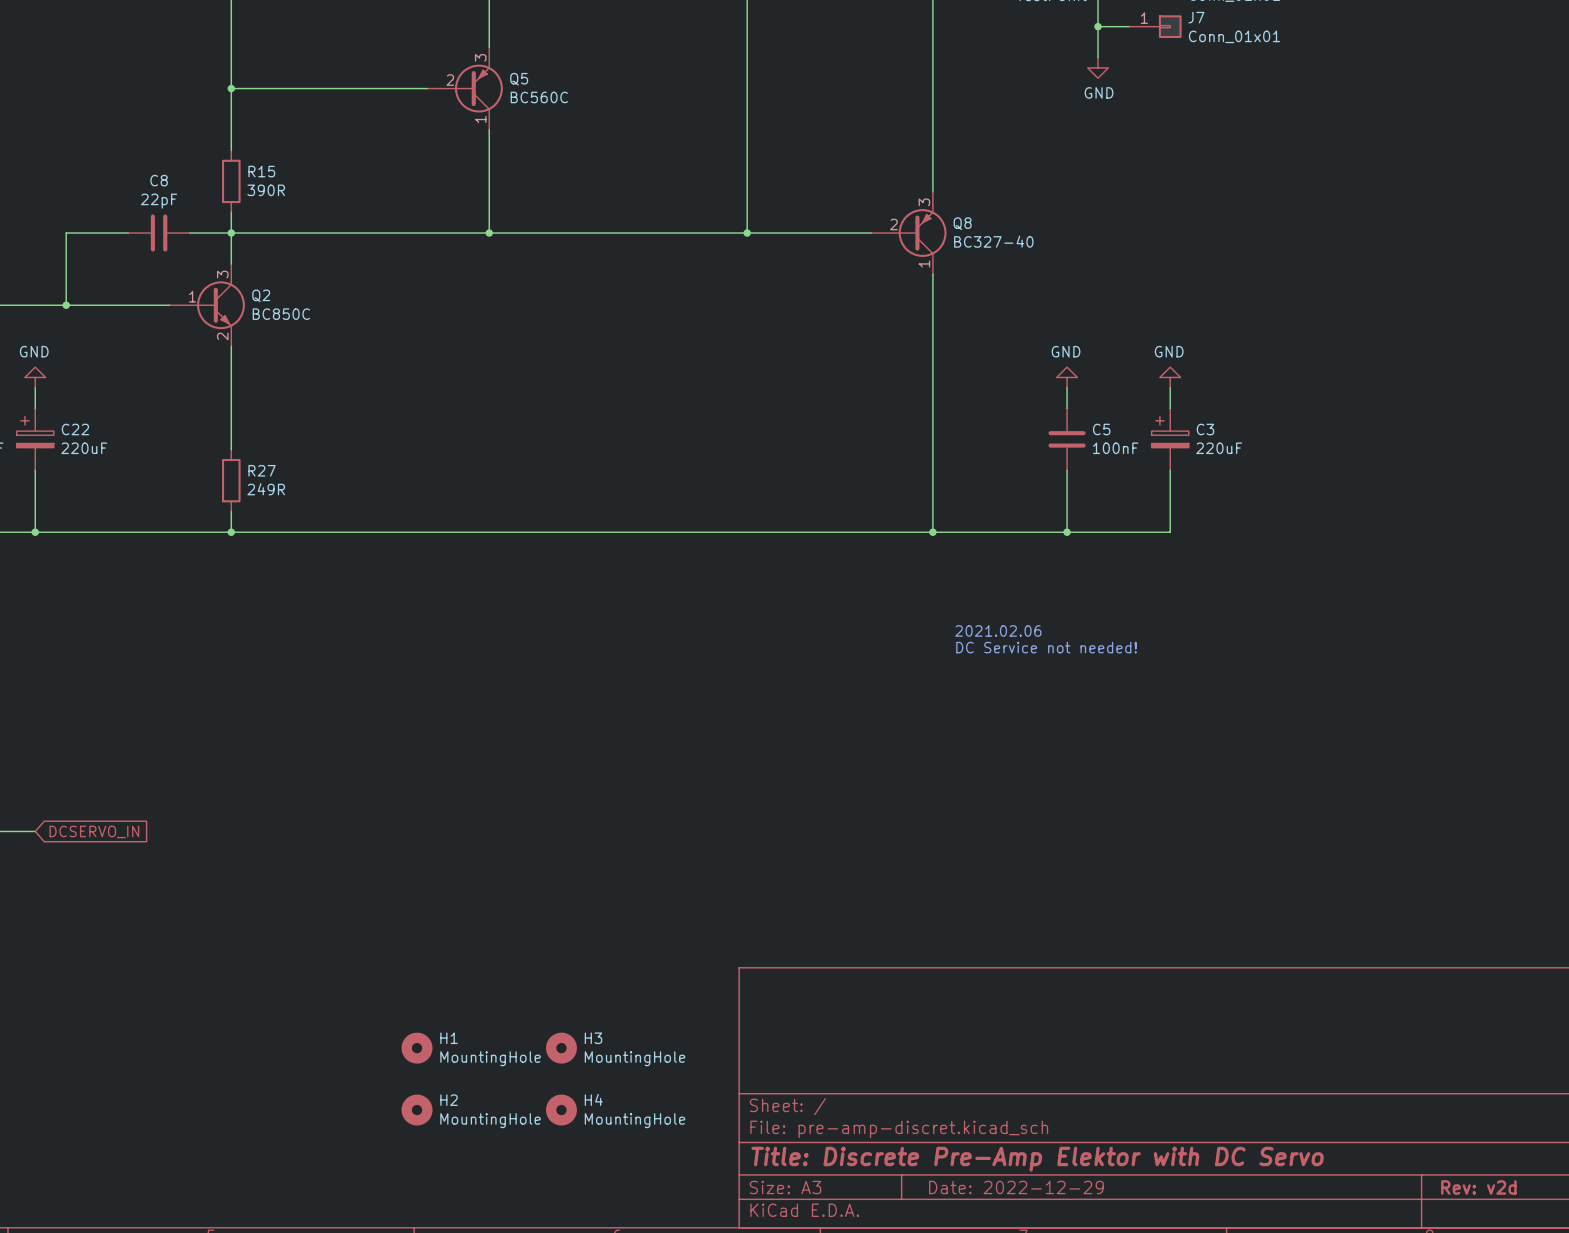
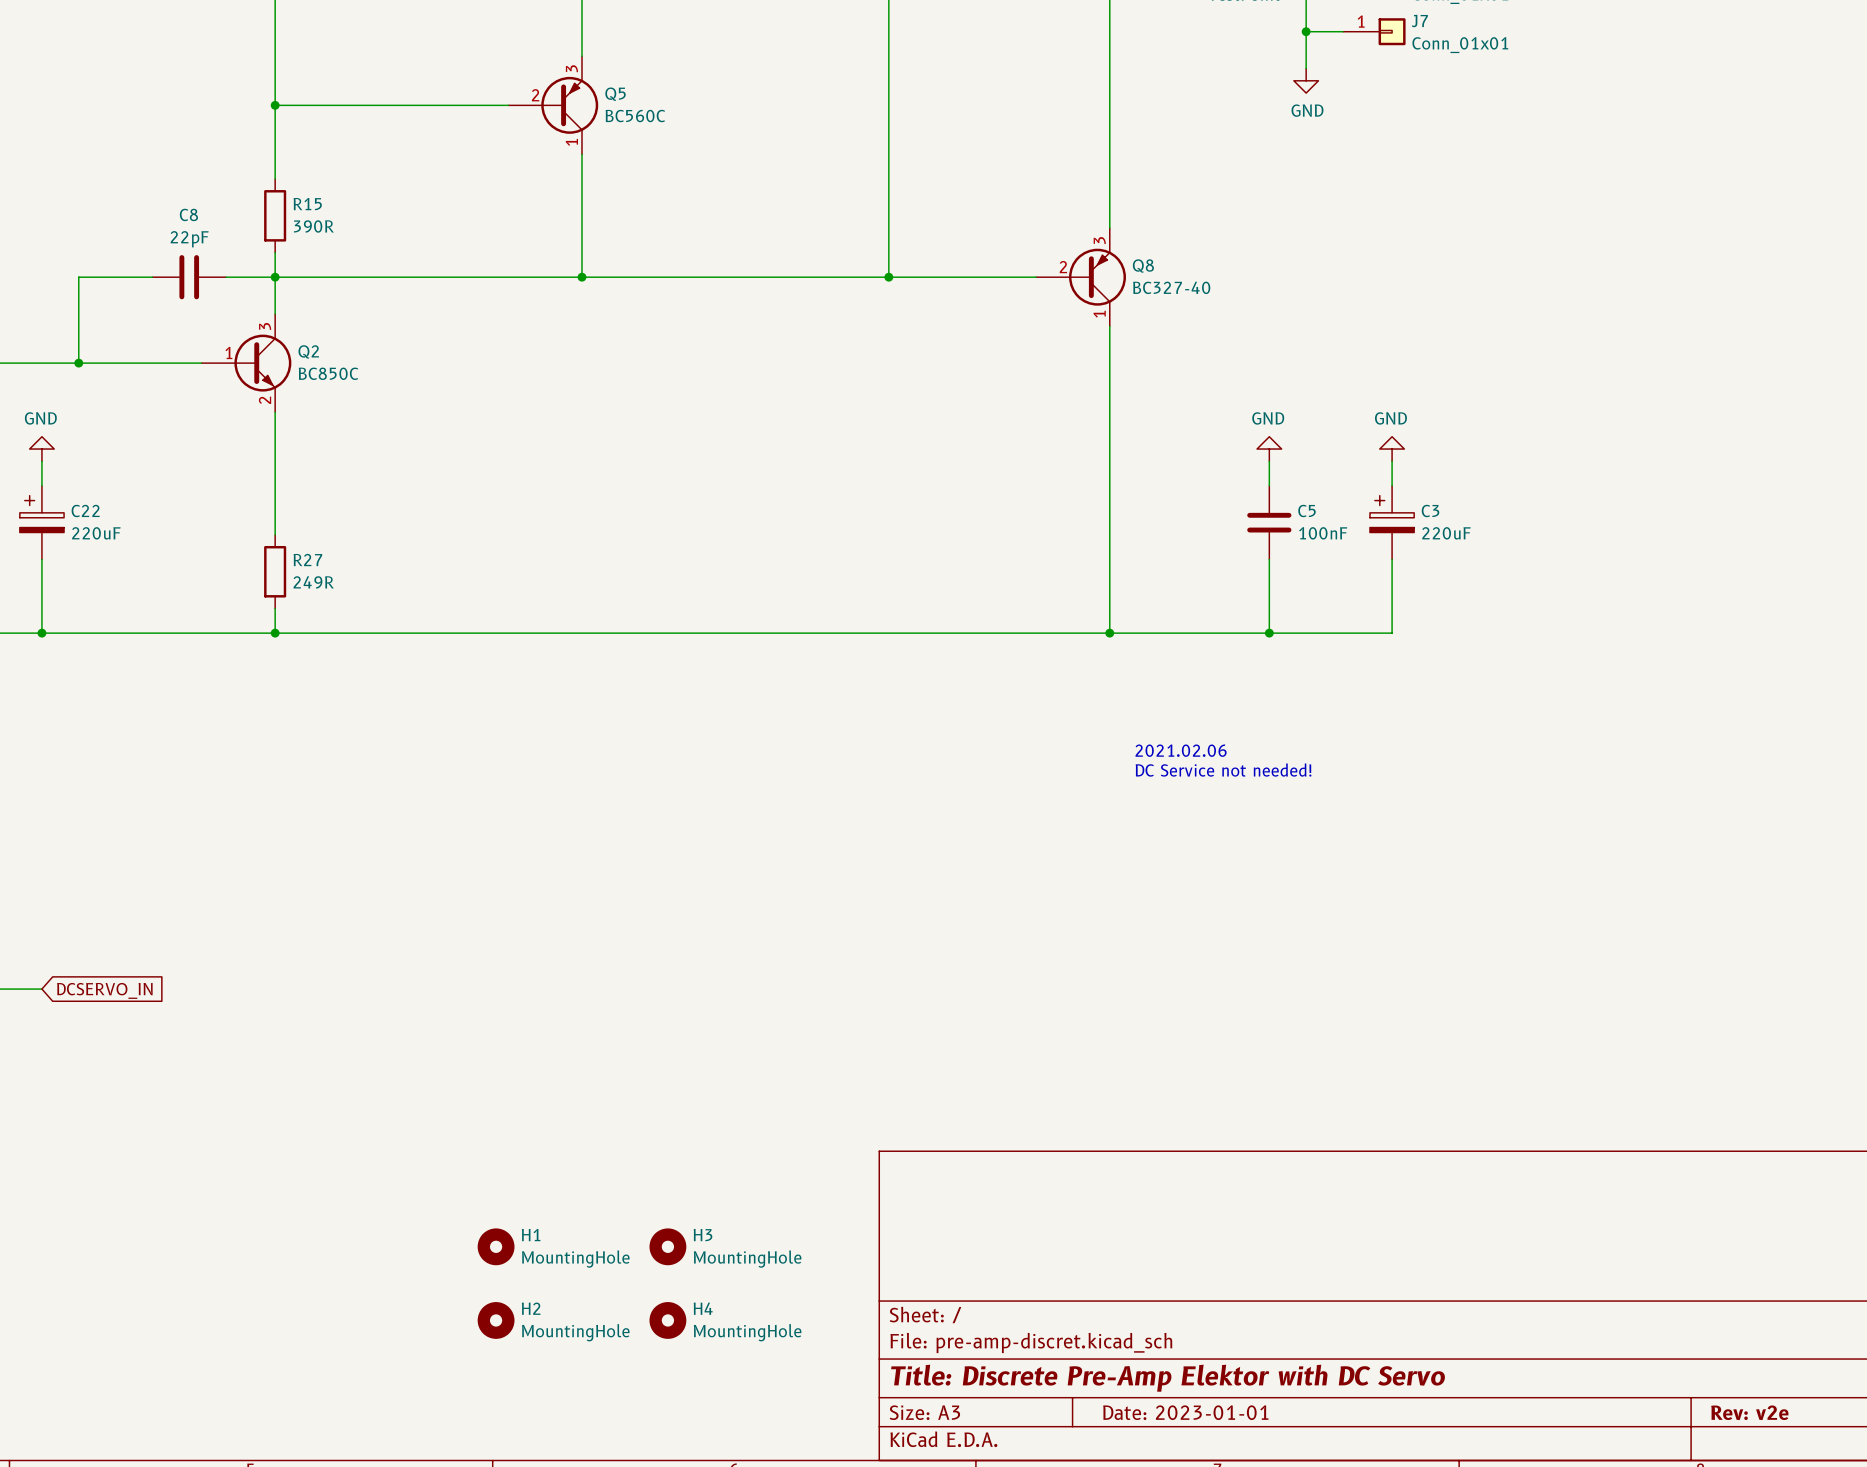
title block: Date: 2022-12-29 (1016, 1187) -> Date: 2023-01-01 (1185, 1412)
title block: Rev: v2d (1478, 1187) -> Rev: v2e (1749, 1412)

